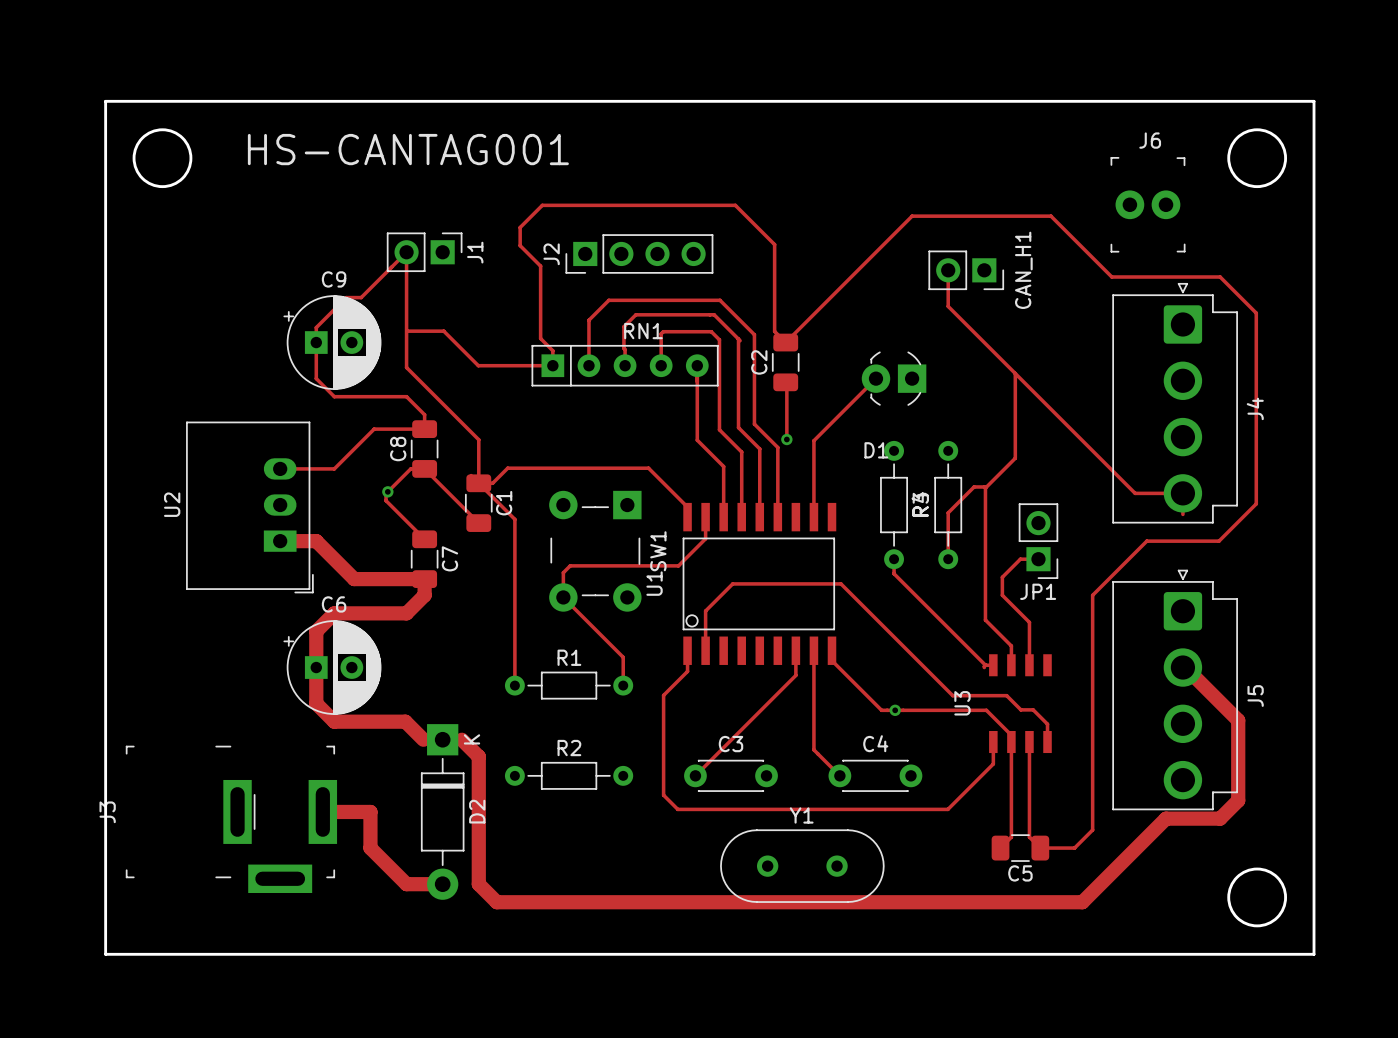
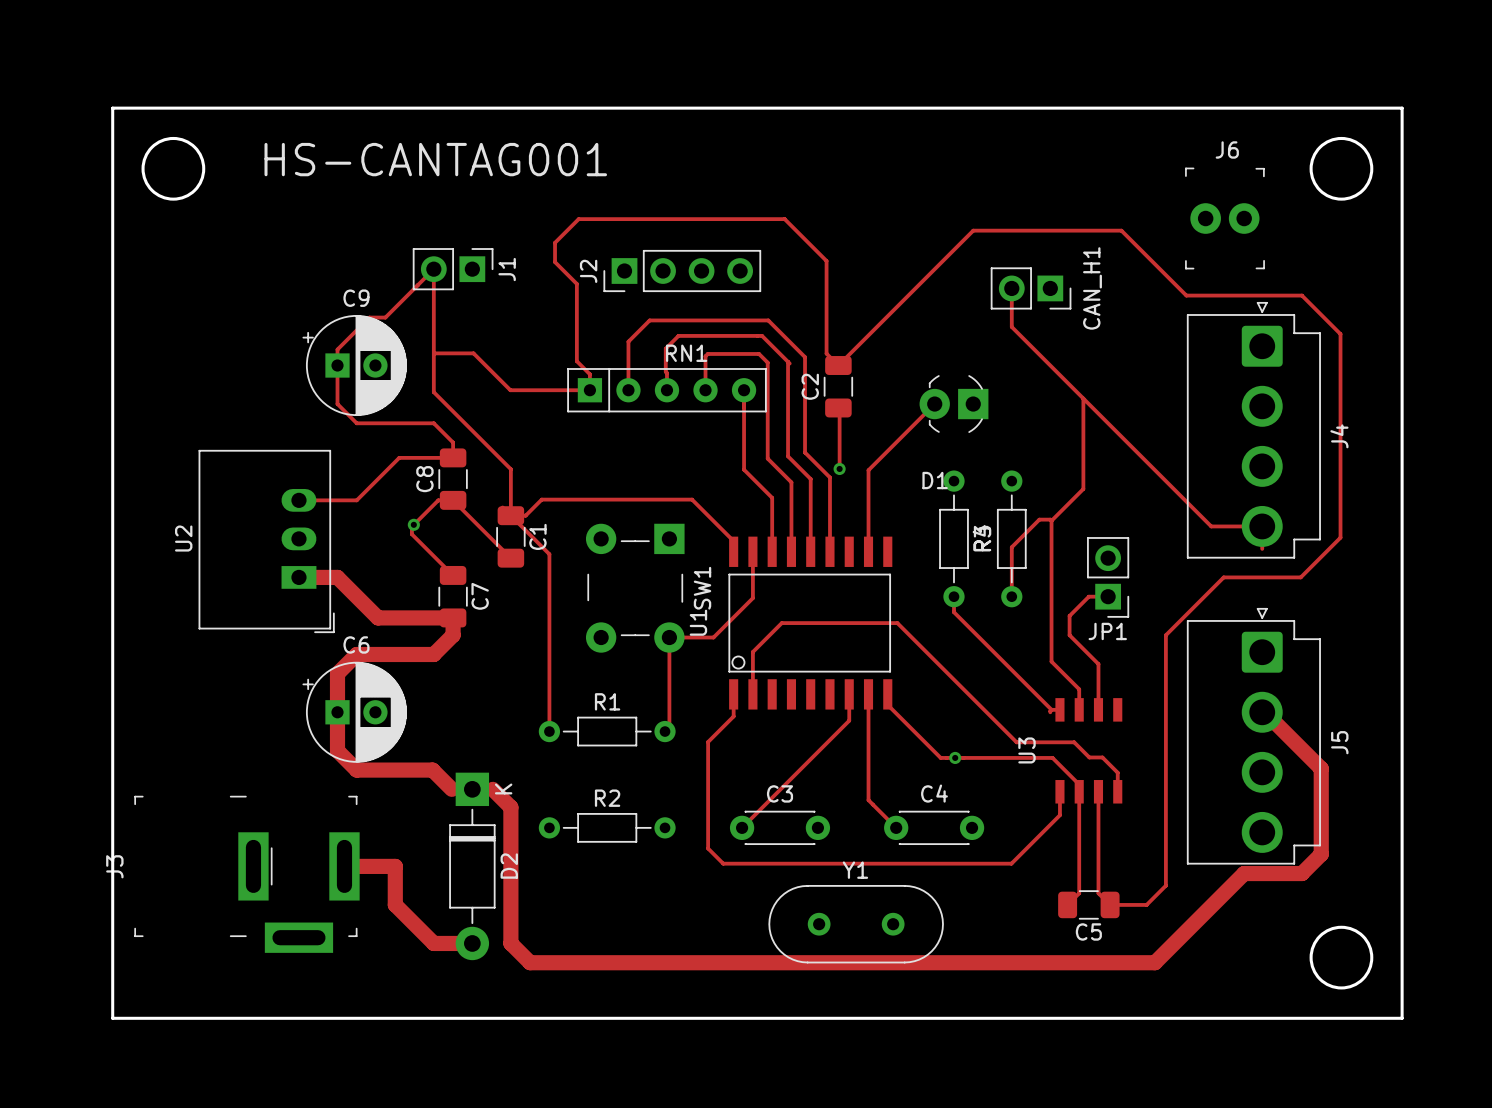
track: (705, 538) (678, 565) (570, 565) (563, 572) (563, 597) (623, 657) (623, 685) -> (752, 574) (752, 598) (713, 637) (669, 637) (669, 727)

